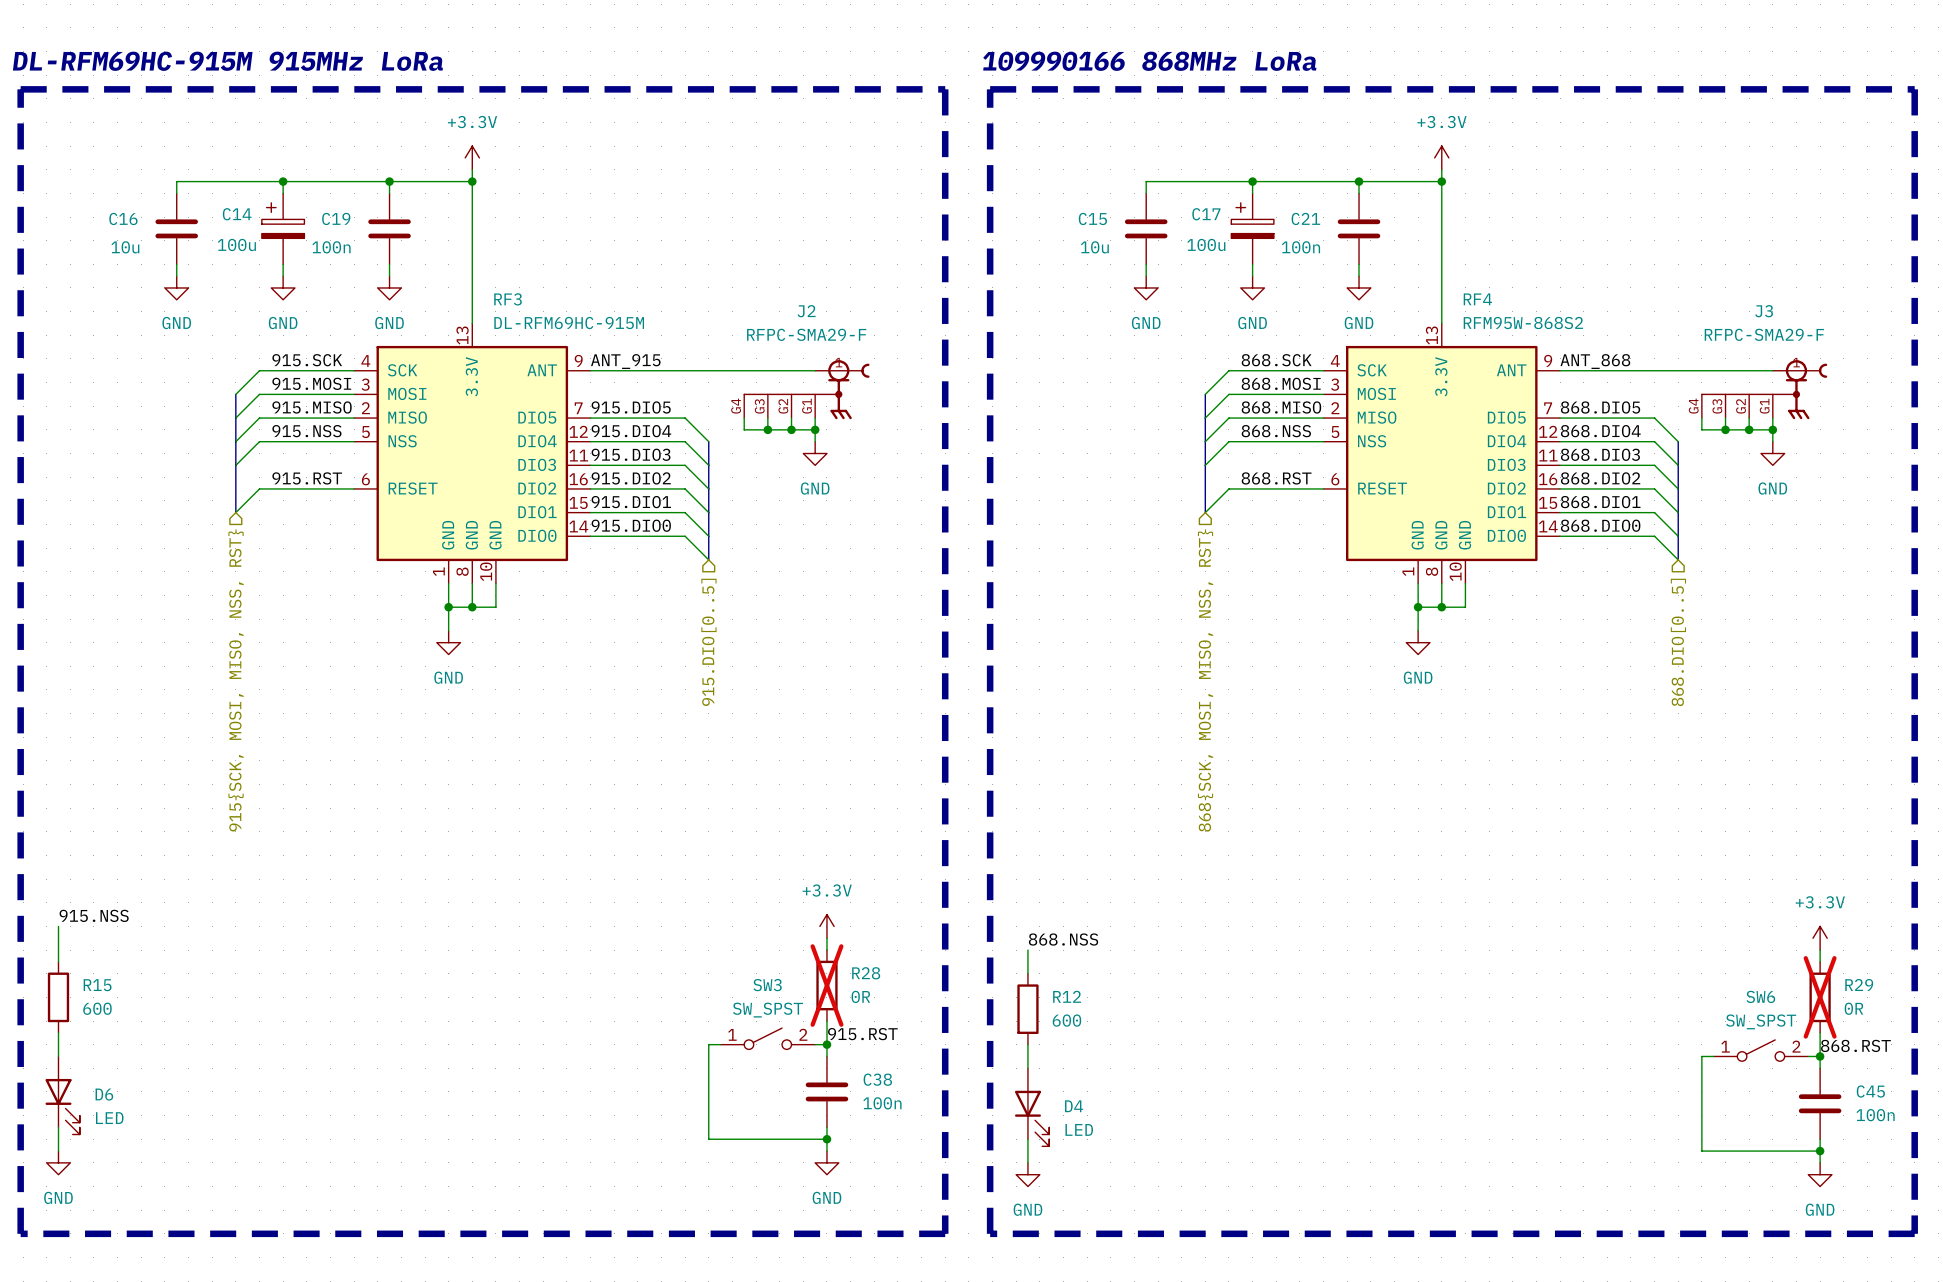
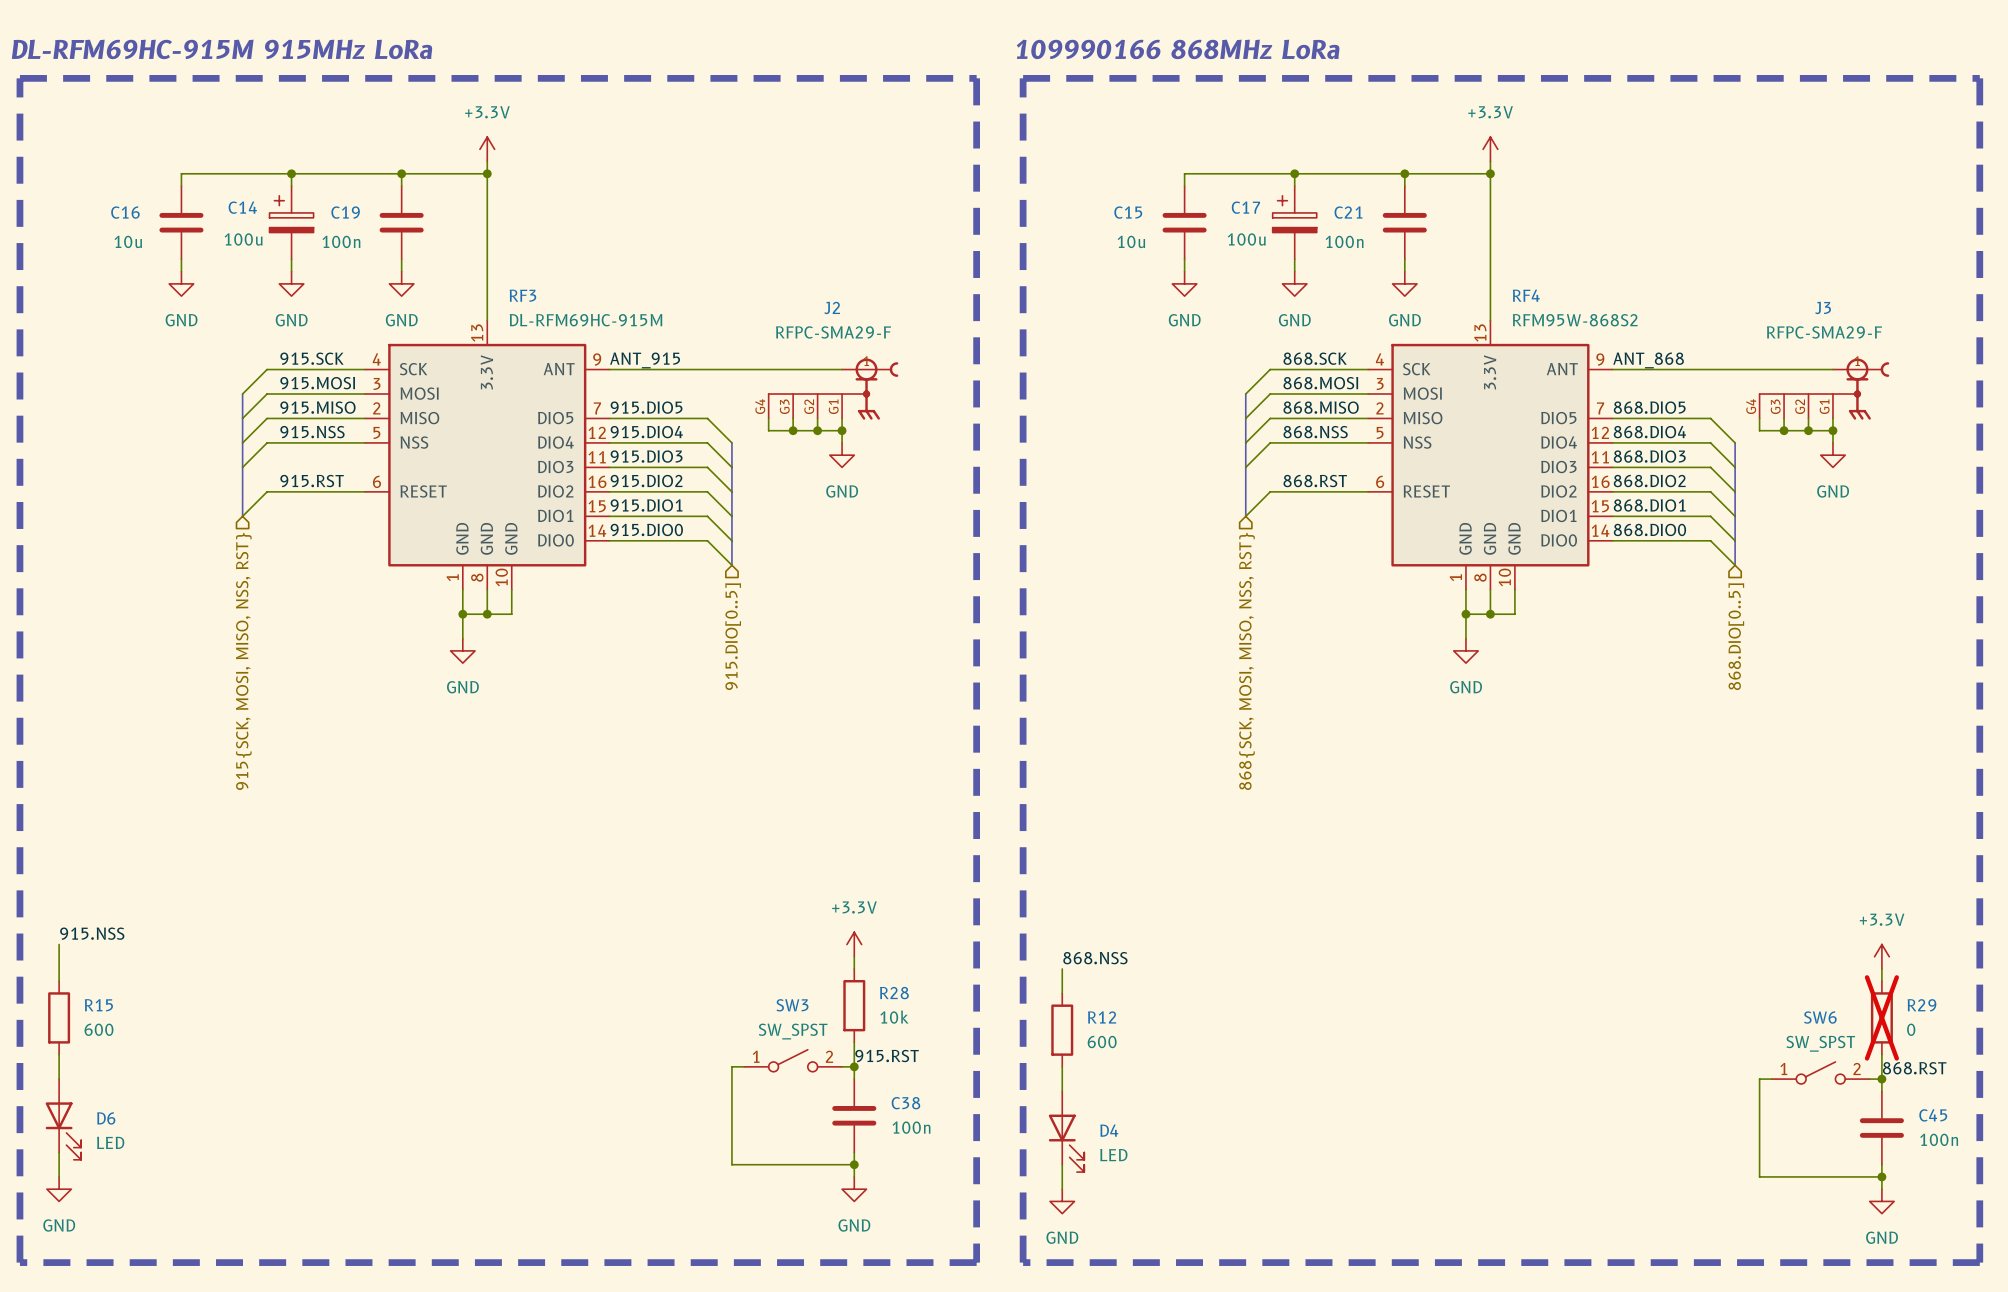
R28 do-not-place cross: (826, 985) -> none
R28 value: 0R (860, 996) -> 10k (894, 1017)
R29 value: 0R (1853, 1008) -> 0 (1911, 1029)

